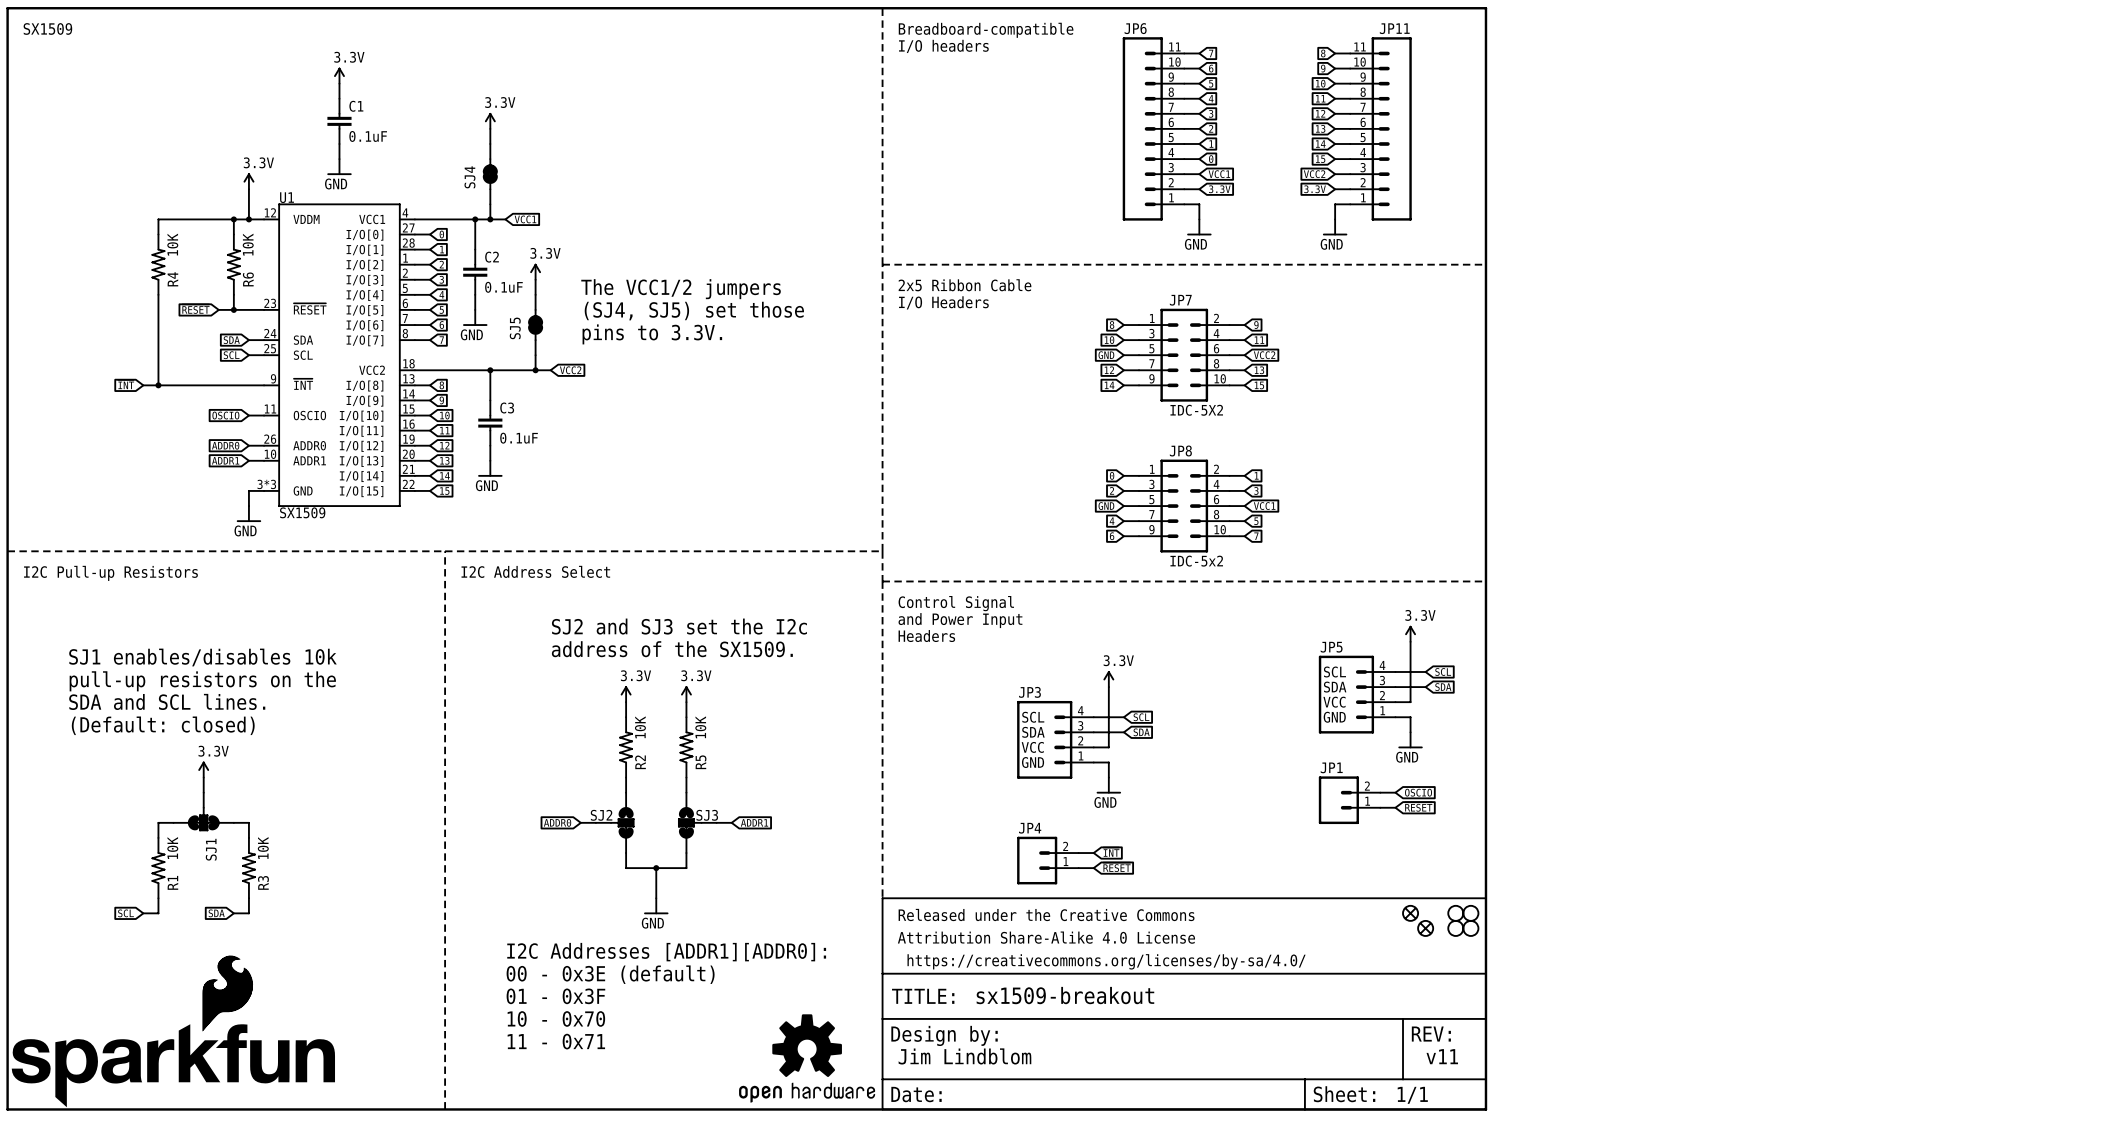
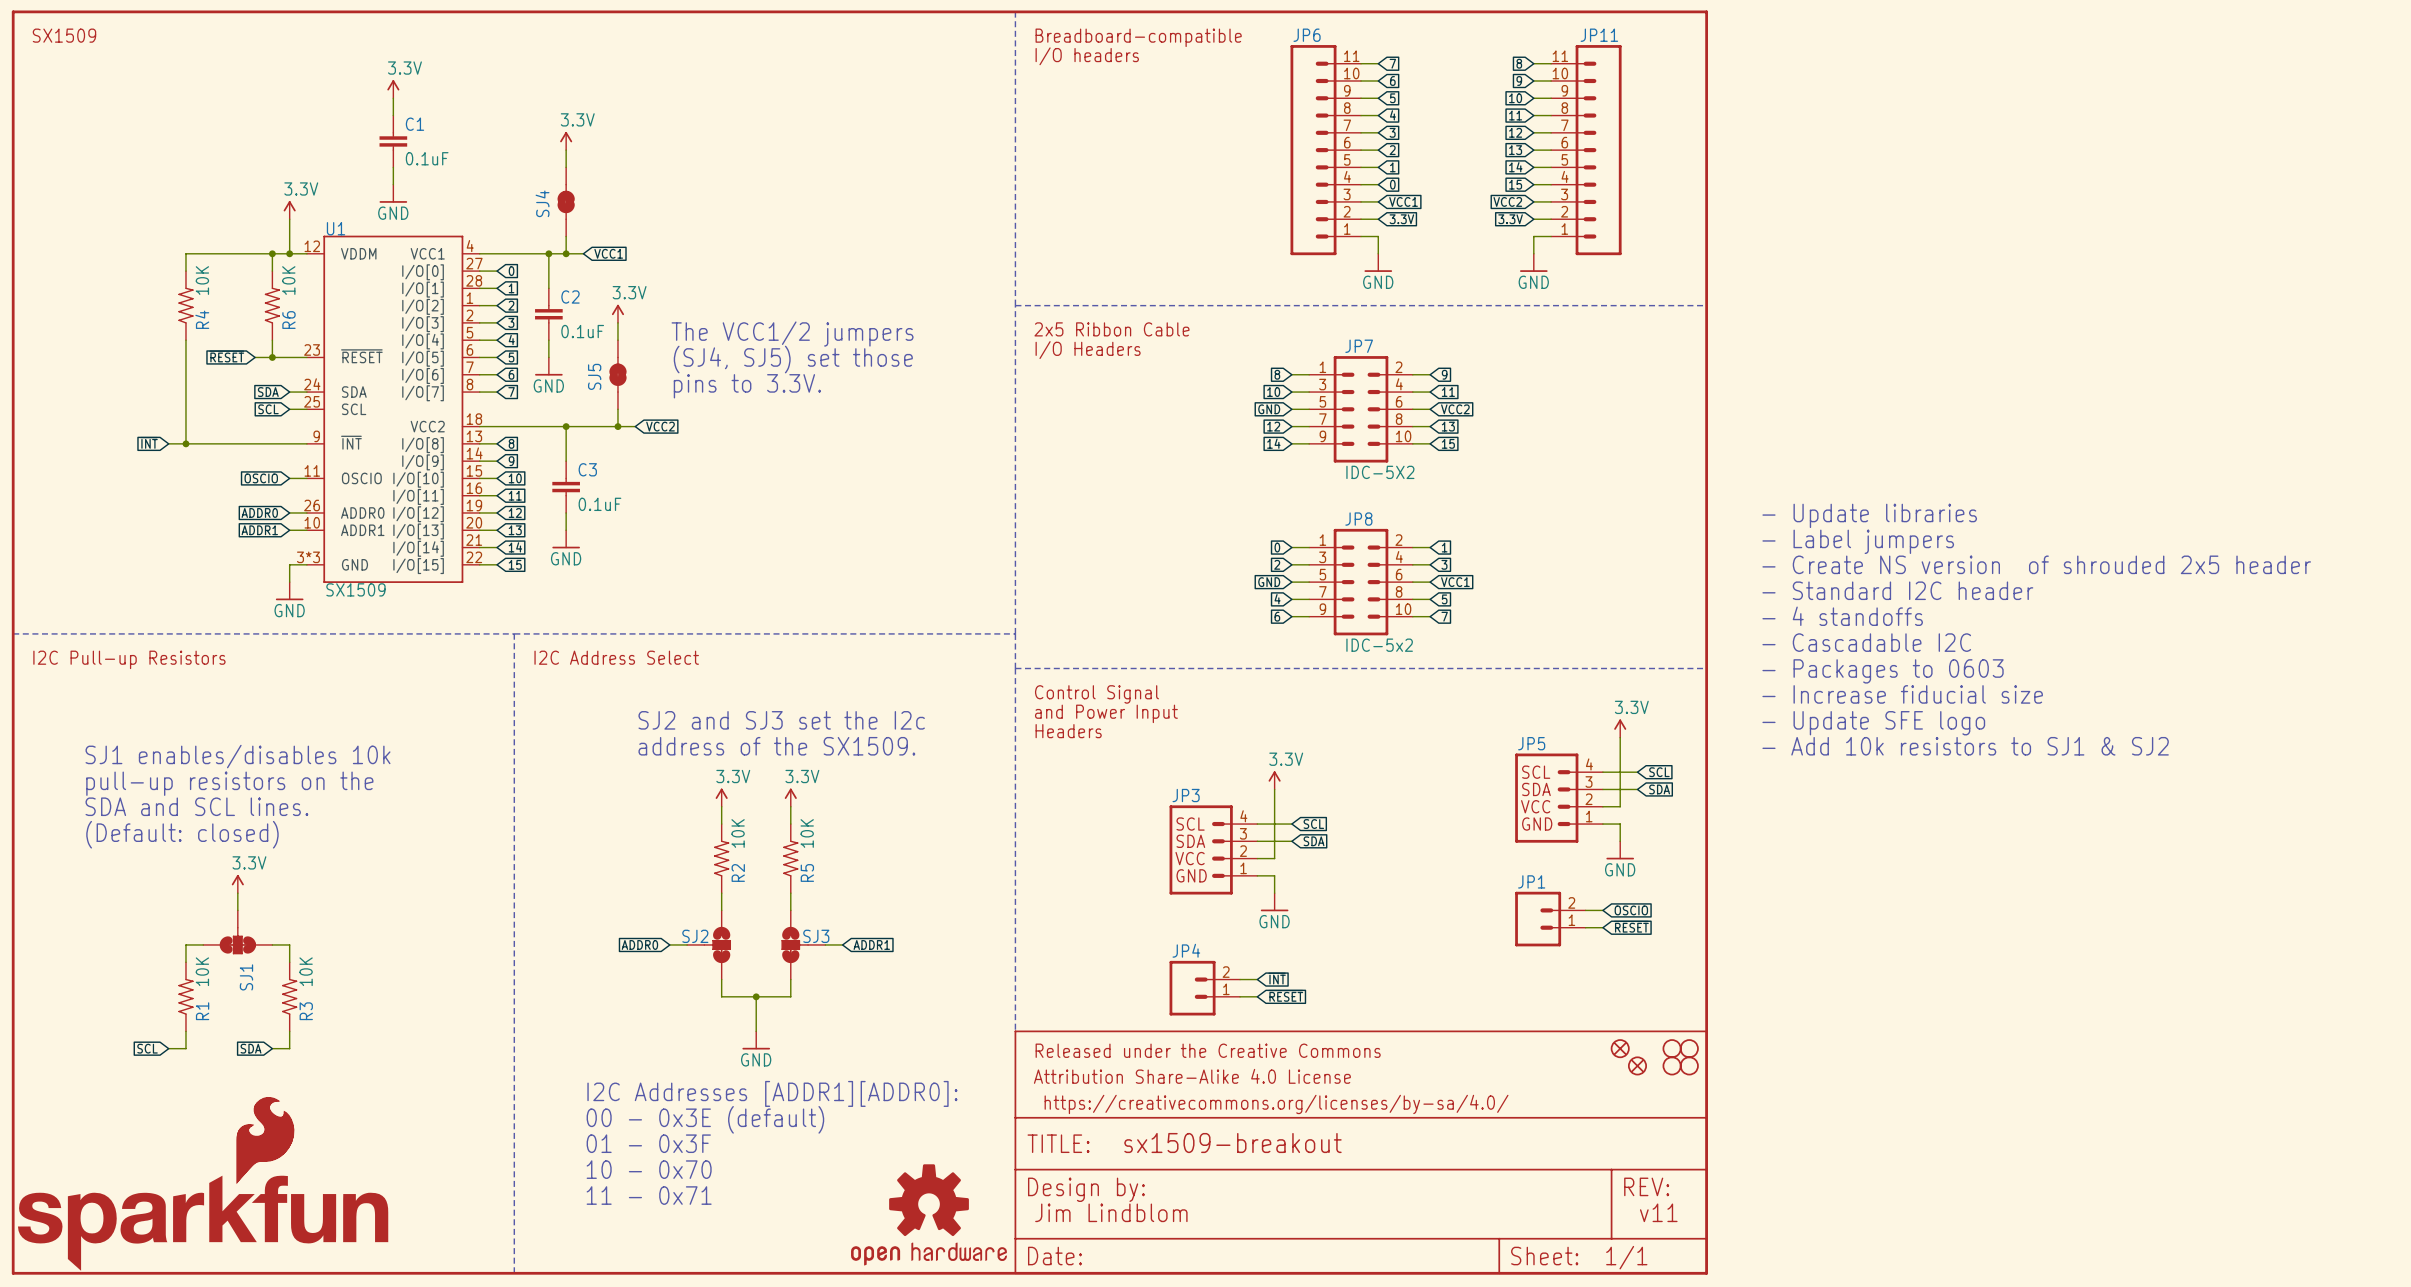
text: none -> - Update libraries (1869, 515)
text: none -> - Label jumpers (1858, 541)
text: none -> - Create NS version of shrouded 2x5 header (2036, 564)
text: none -> - Standard I2C header (1897, 590)
text: none -> - 4 standoffs (1842, 616)
text: none -> - Cascadable I2C (1866, 642)
text: none -> - Packages to 0603 (1883, 671)
text: none -> - Increase fiducial size (1902, 694)
text: none -> - Update SFE logo (1873, 723)
text: none -> - Add 10k resistors to SJ1 & SJ2 (1965, 746)

